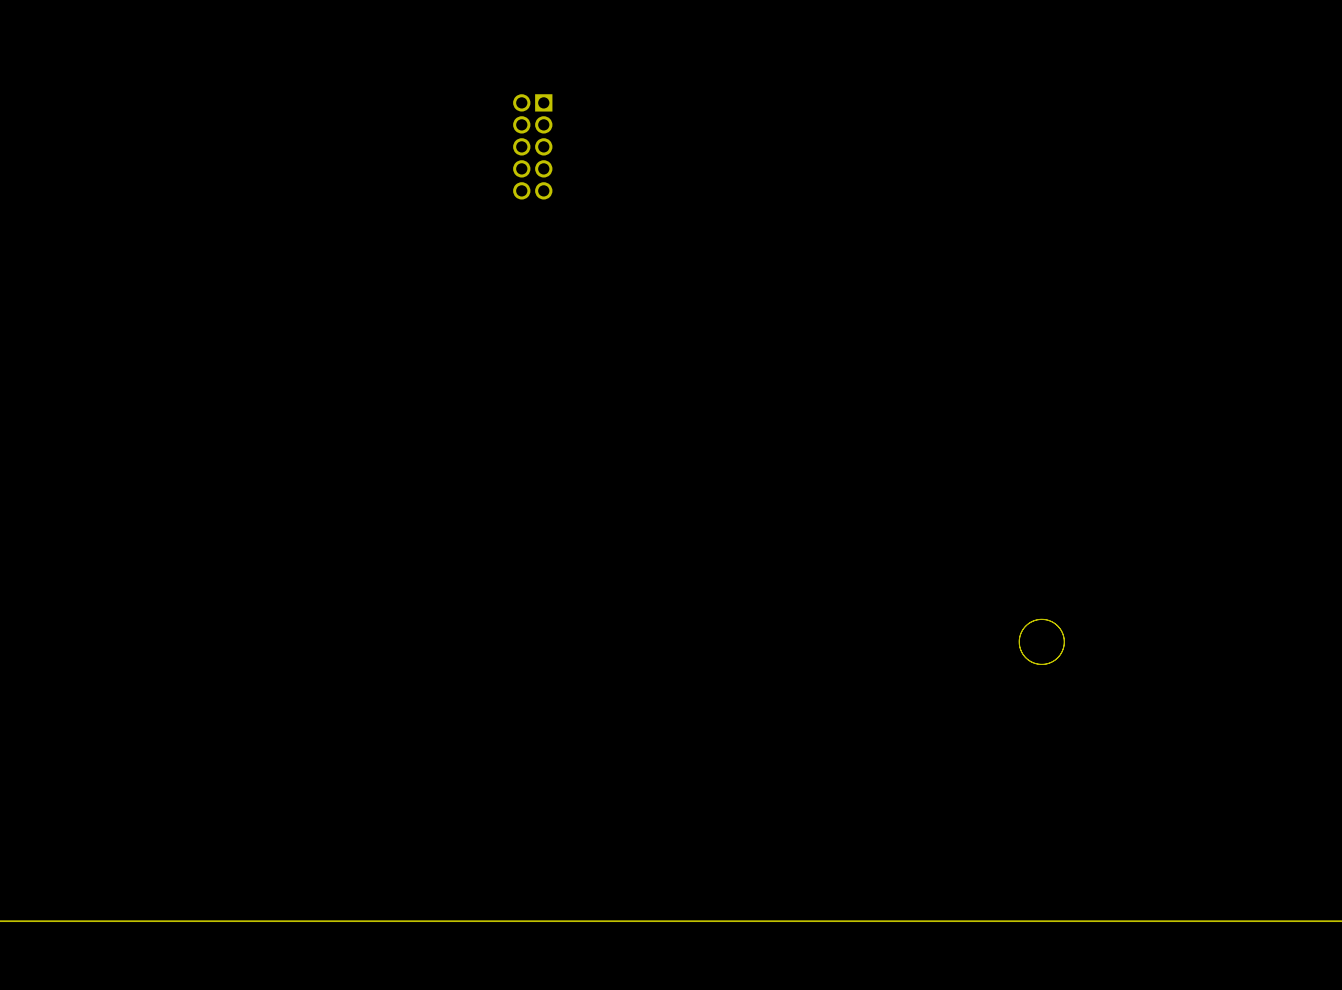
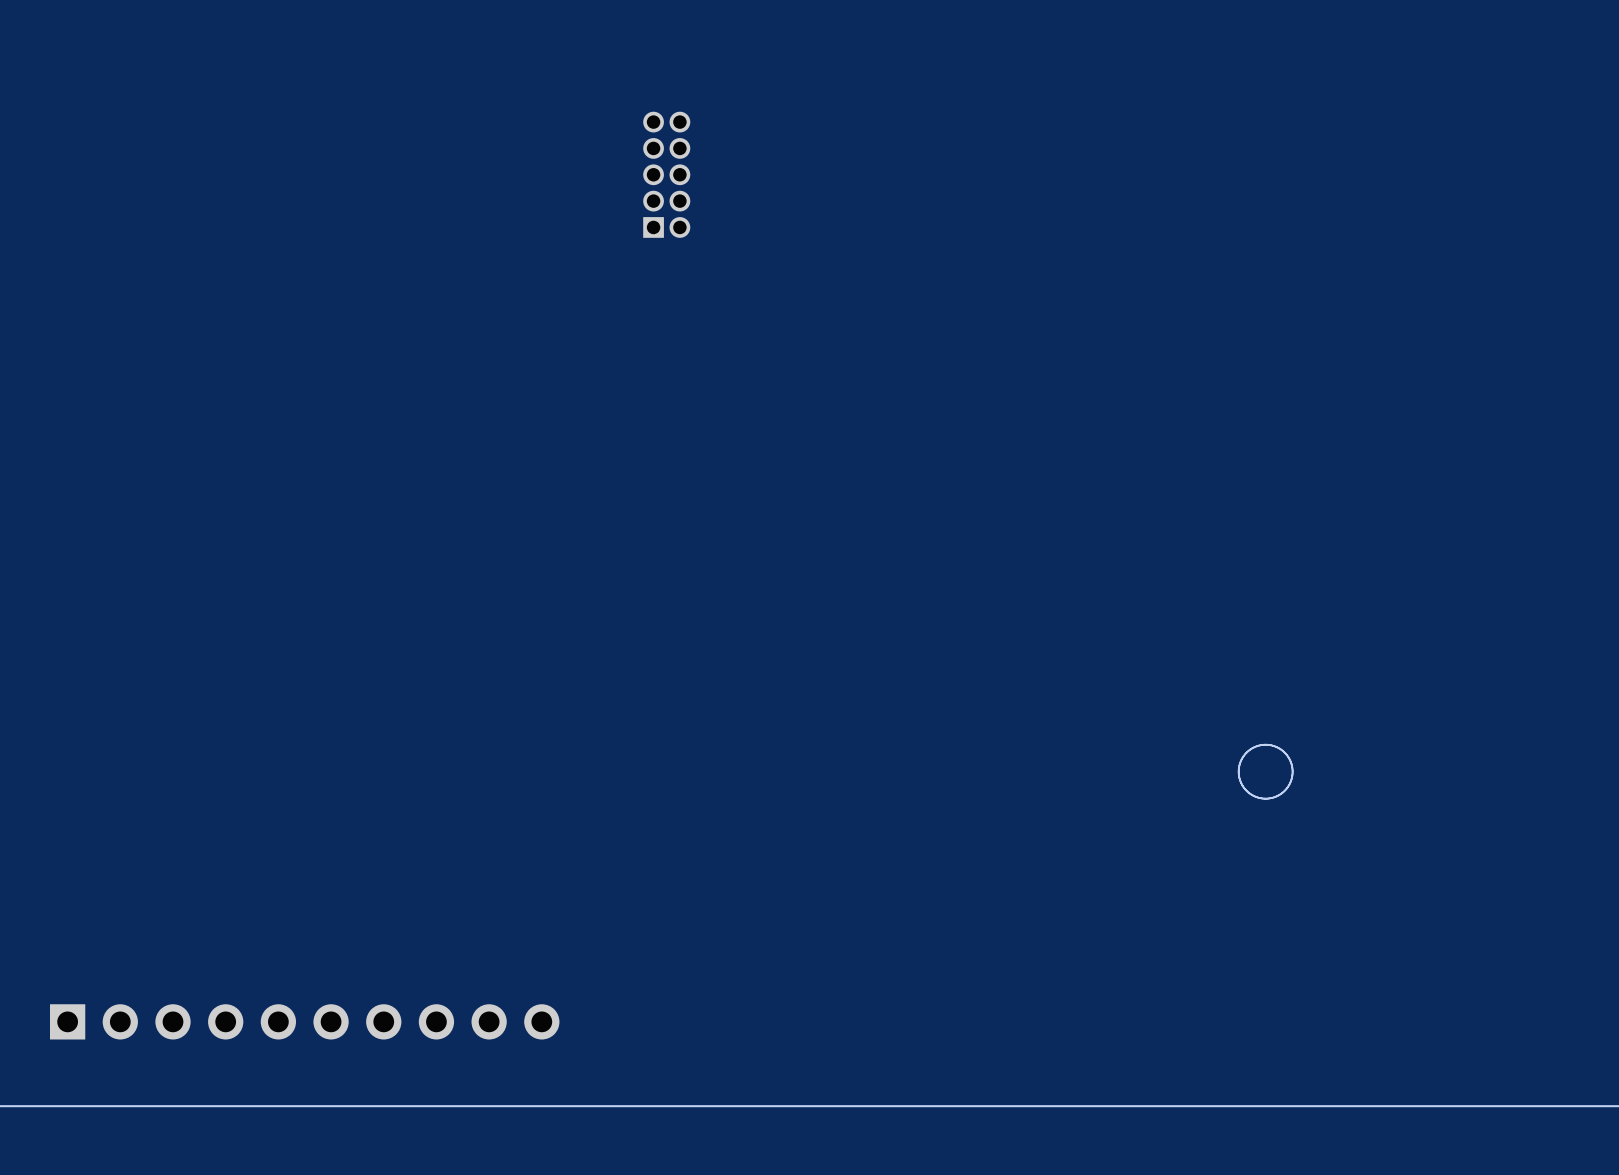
part rotation: 0° (532, 146) -> 180° (666, 174)
part: none -> (304, 1021)

